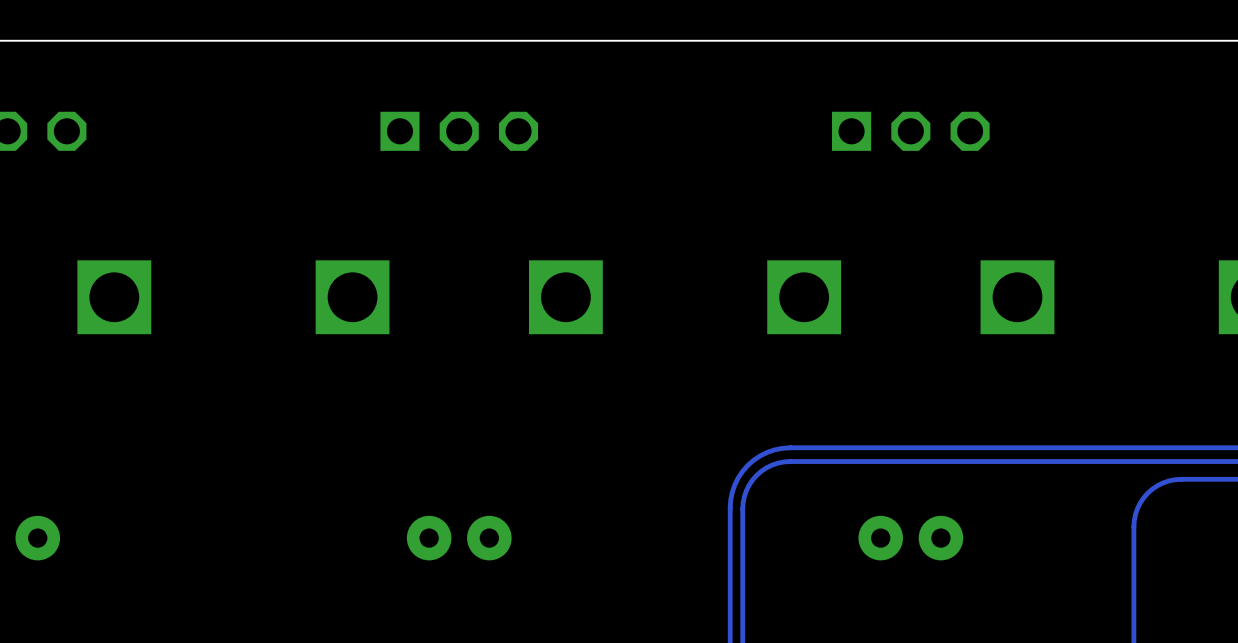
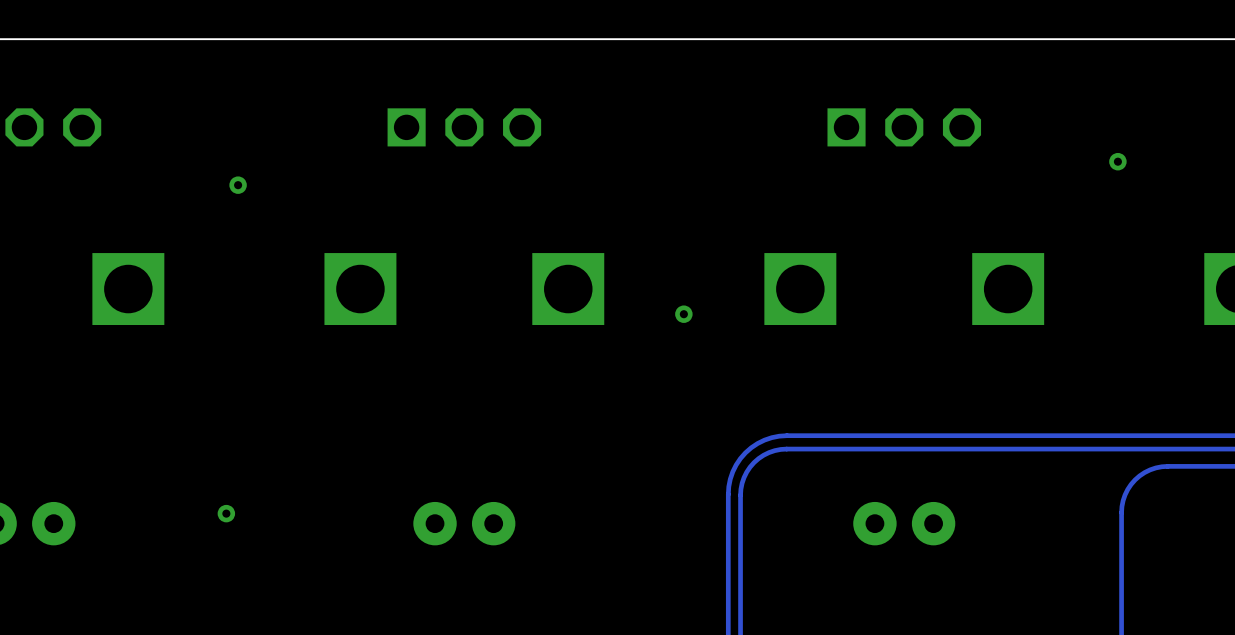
via: none -> (1117, 161)
via: none -> (238, 185)
via: none -> (683, 314)
via: none -> (226, 513)

